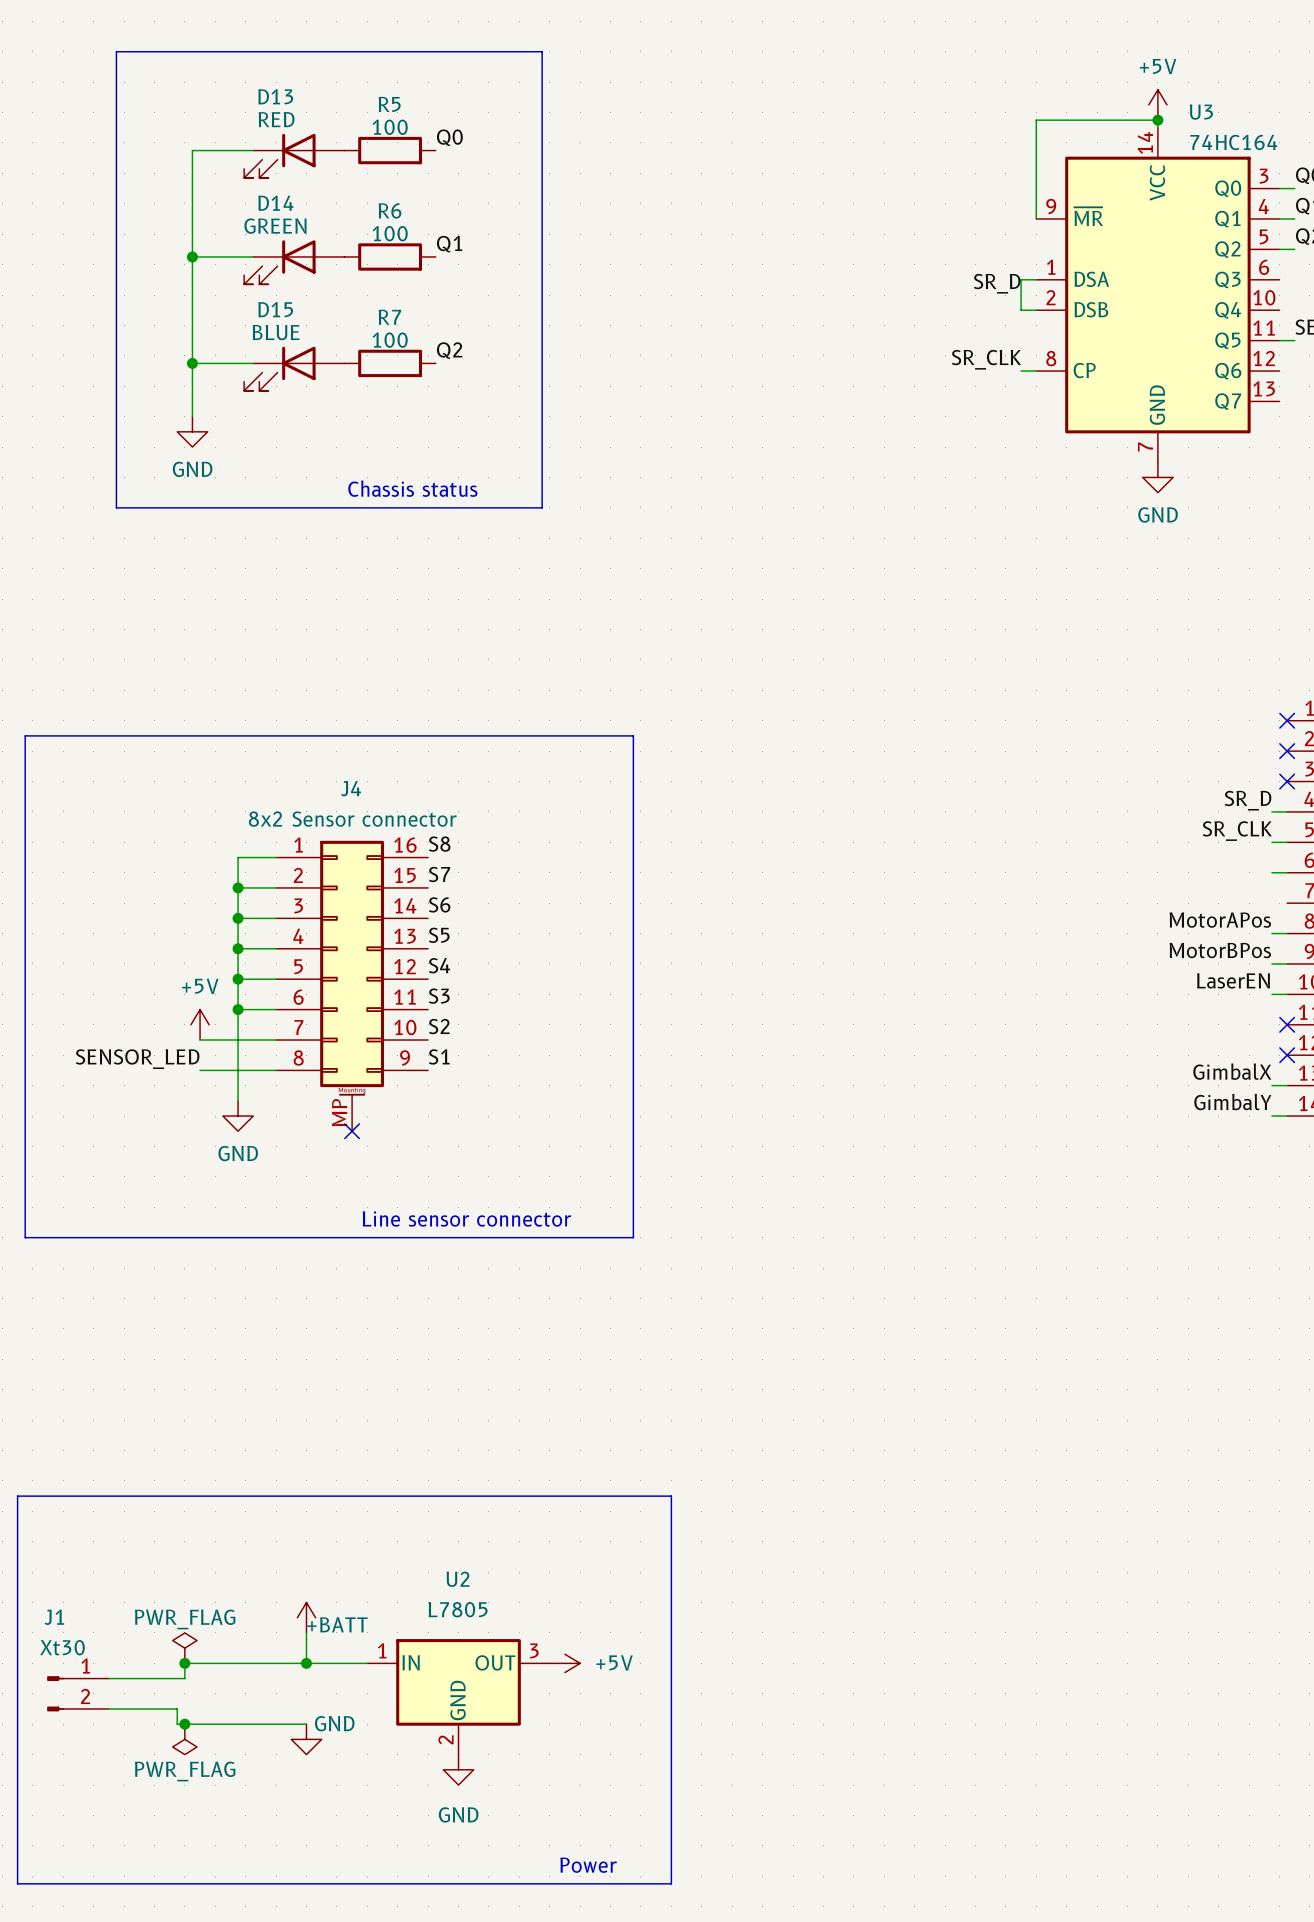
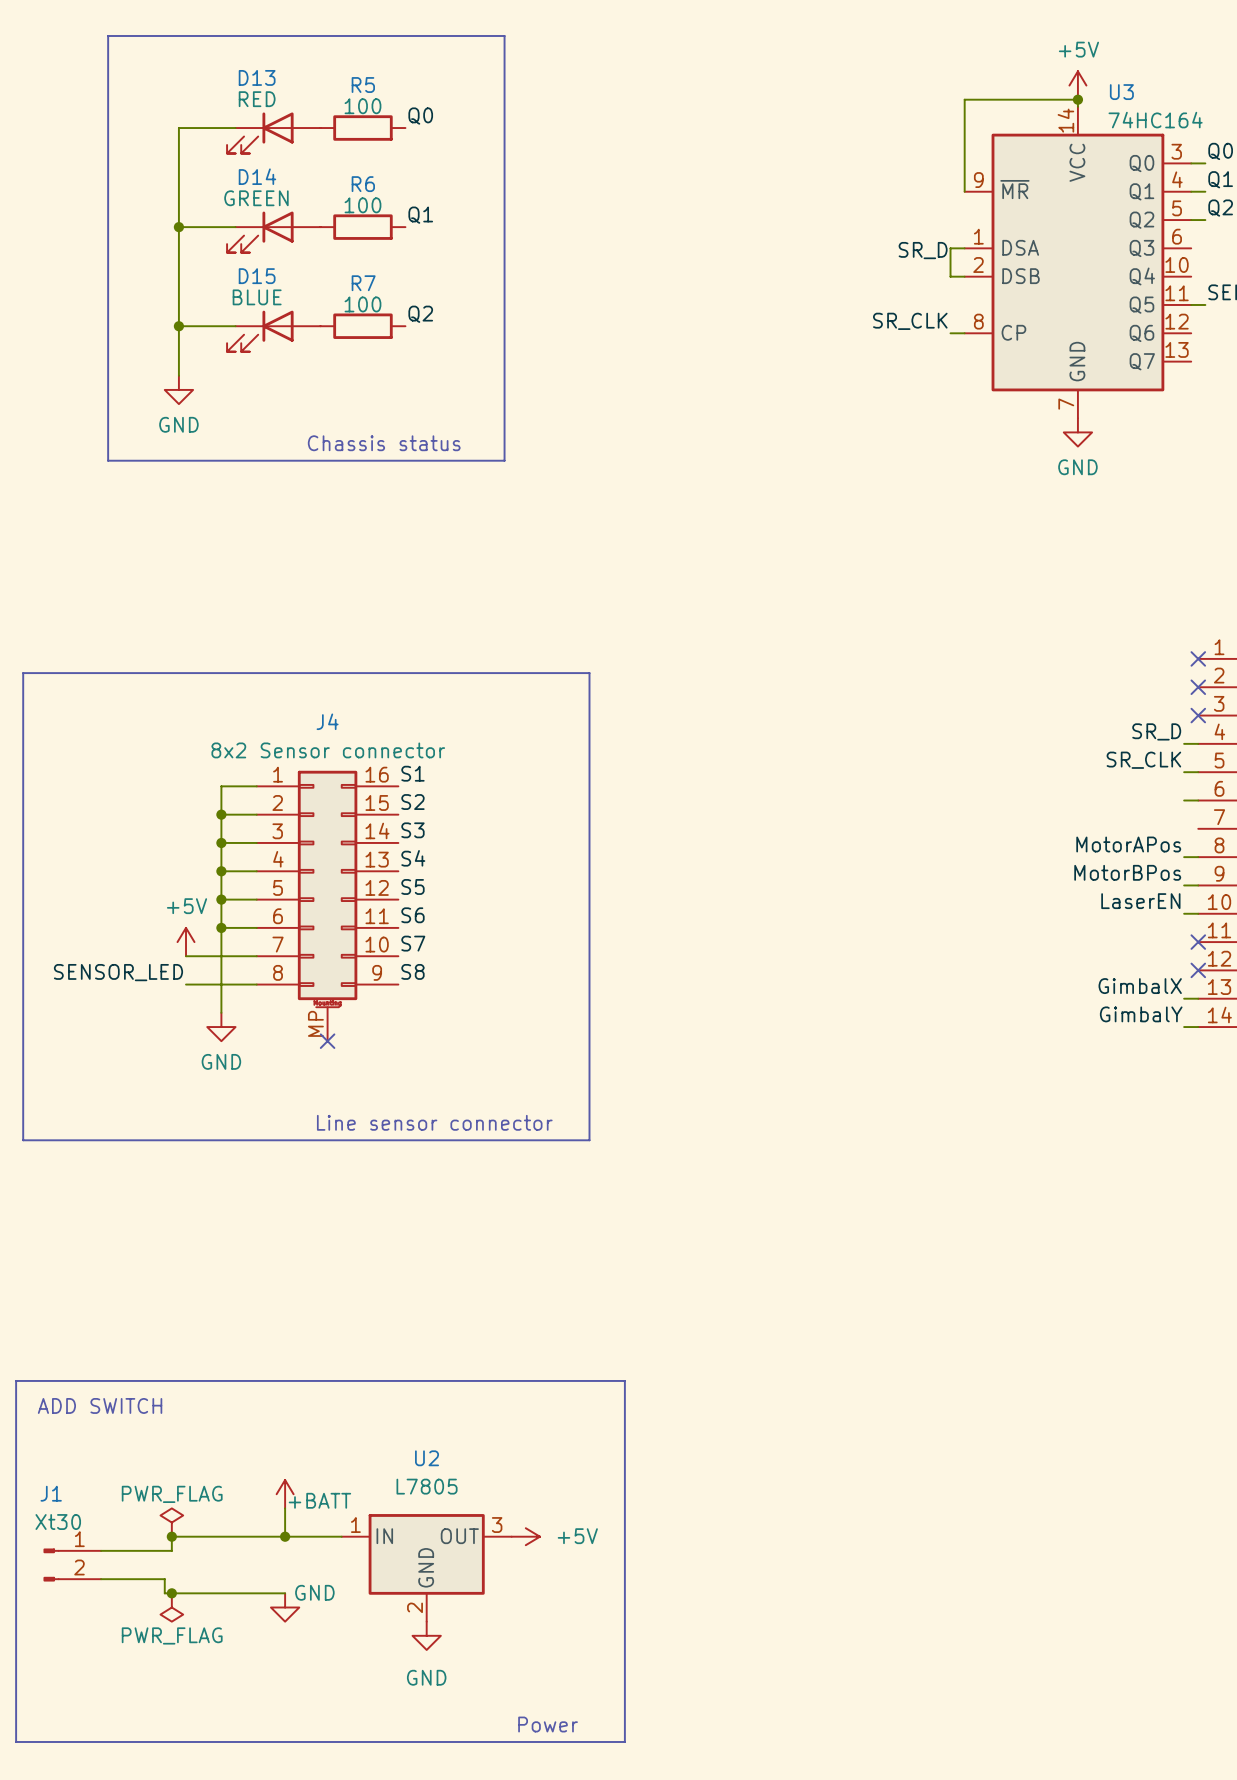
label: S8 (439, 844) -> S1 (412, 773)
label: S7 (439, 874) -> S2 (412, 802)
label: S6 (439, 904) -> S3 (412, 830)
label: S5 (439, 935) -> S4 (413, 858)
label: S4 (439, 965) -> S5 (412, 886)
label: S3 (439, 996) -> S6 (412, 915)
label: S2 (439, 1026) -> S7 (413, 943)
label: S1 (439, 1056) -> S8 (412, 971)
text: none -> ADD SWITCH (100, 1405)

